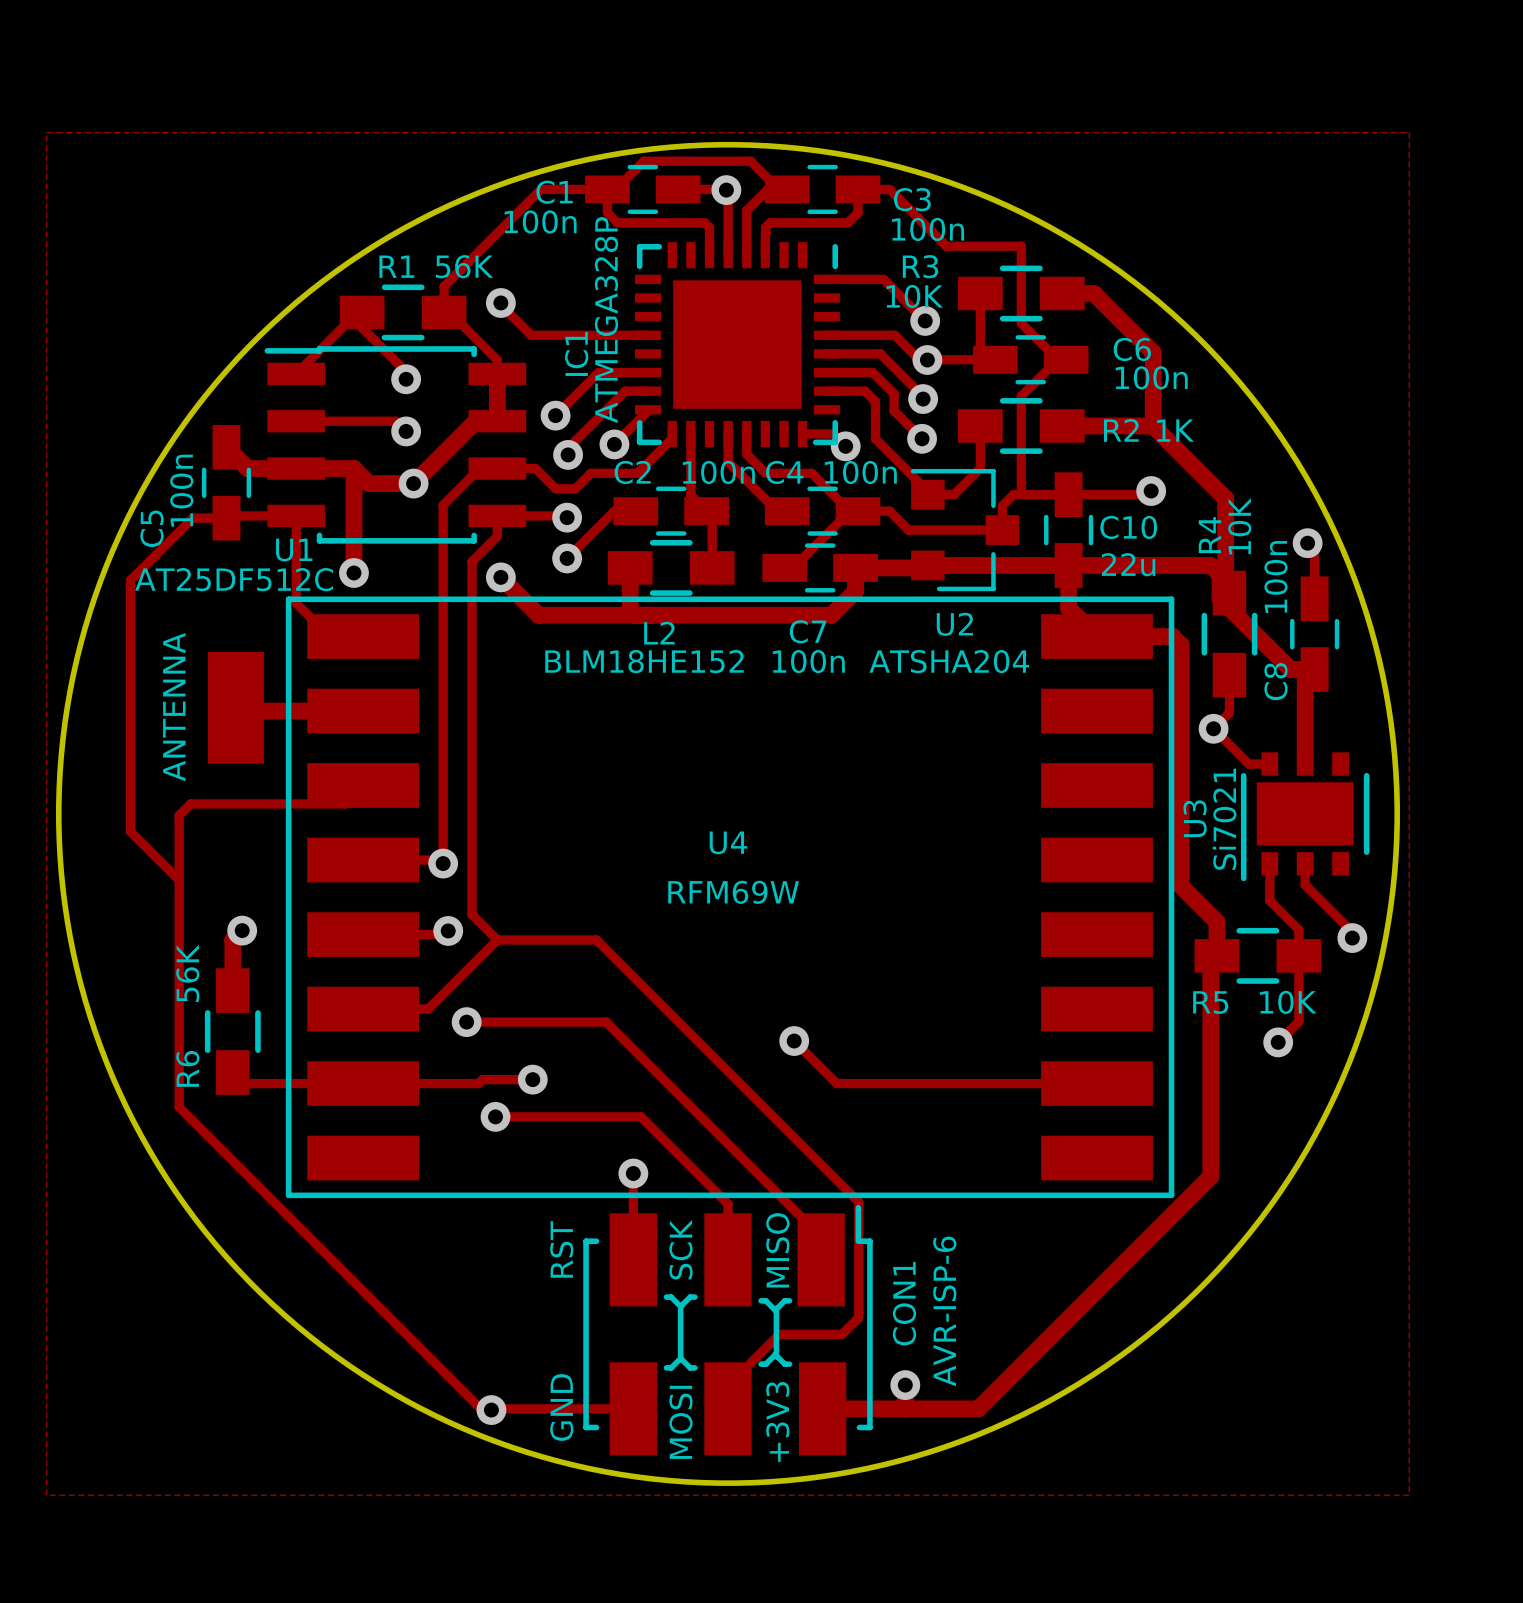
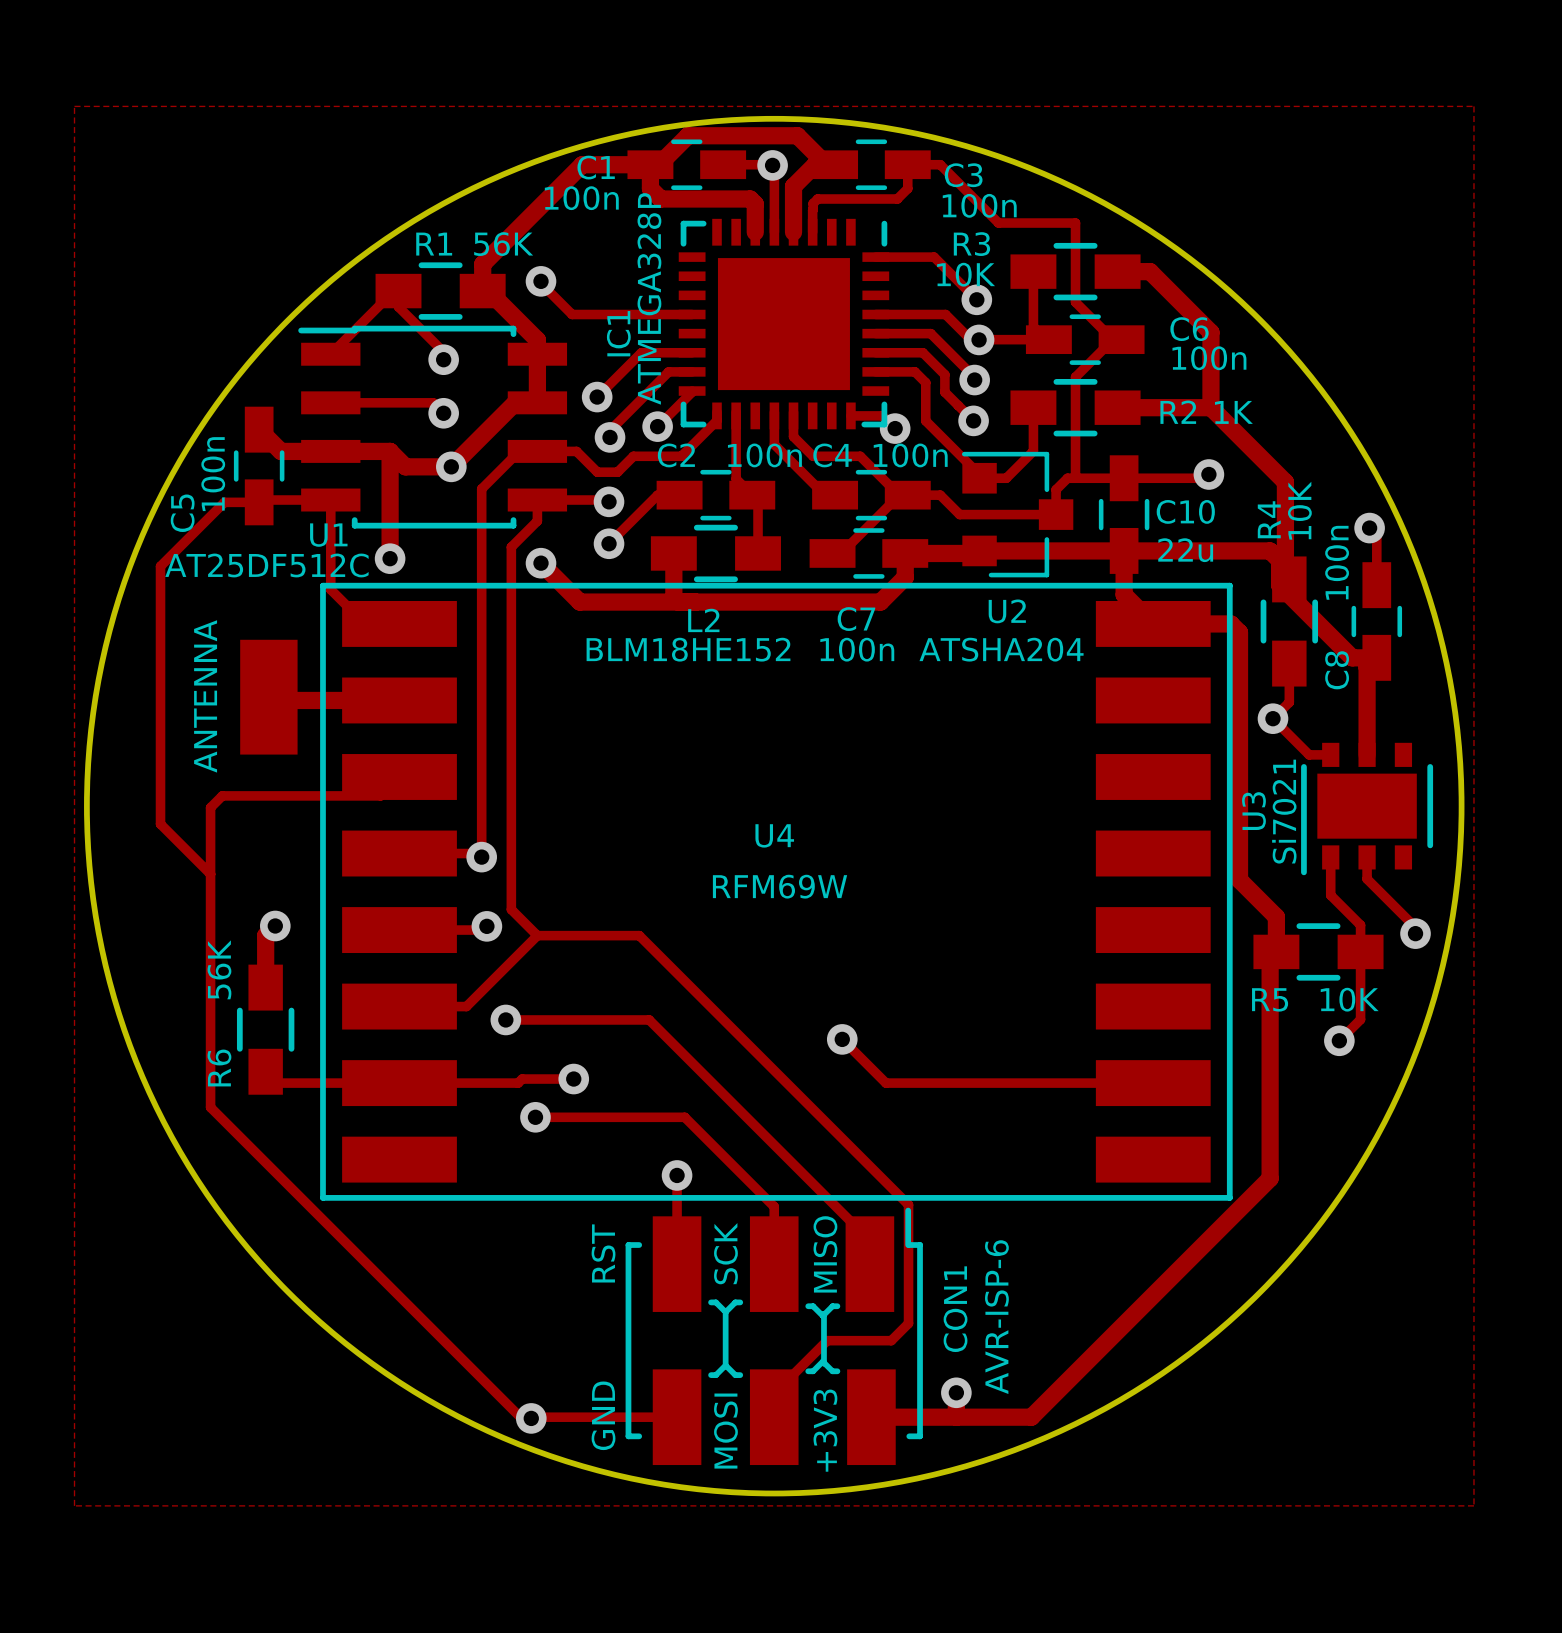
track width: thin (615, 189) (644, 161) (750, 161) (778, 189) (767, 189) (746, 210) (746, 255) -> thick (659, 164) (688, 135) (797, 135) (826, 164) (815, 164) (793, 186) (793, 232)
track width: thin (709, 255) (709, 227) (704, 222) (617, 222) (607, 212) (607, 189) (541, 189) (444, 286) (444, 312) -> thick (755, 232) (755, 204) (750, 199) (660, 199) (650, 188) (650, 164) (582, 164) (482, 264) (482, 291)
track width: thin (449, 312) (497, 360) (497, 373) -> thick (488, 291) (537, 340) (537, 354)

